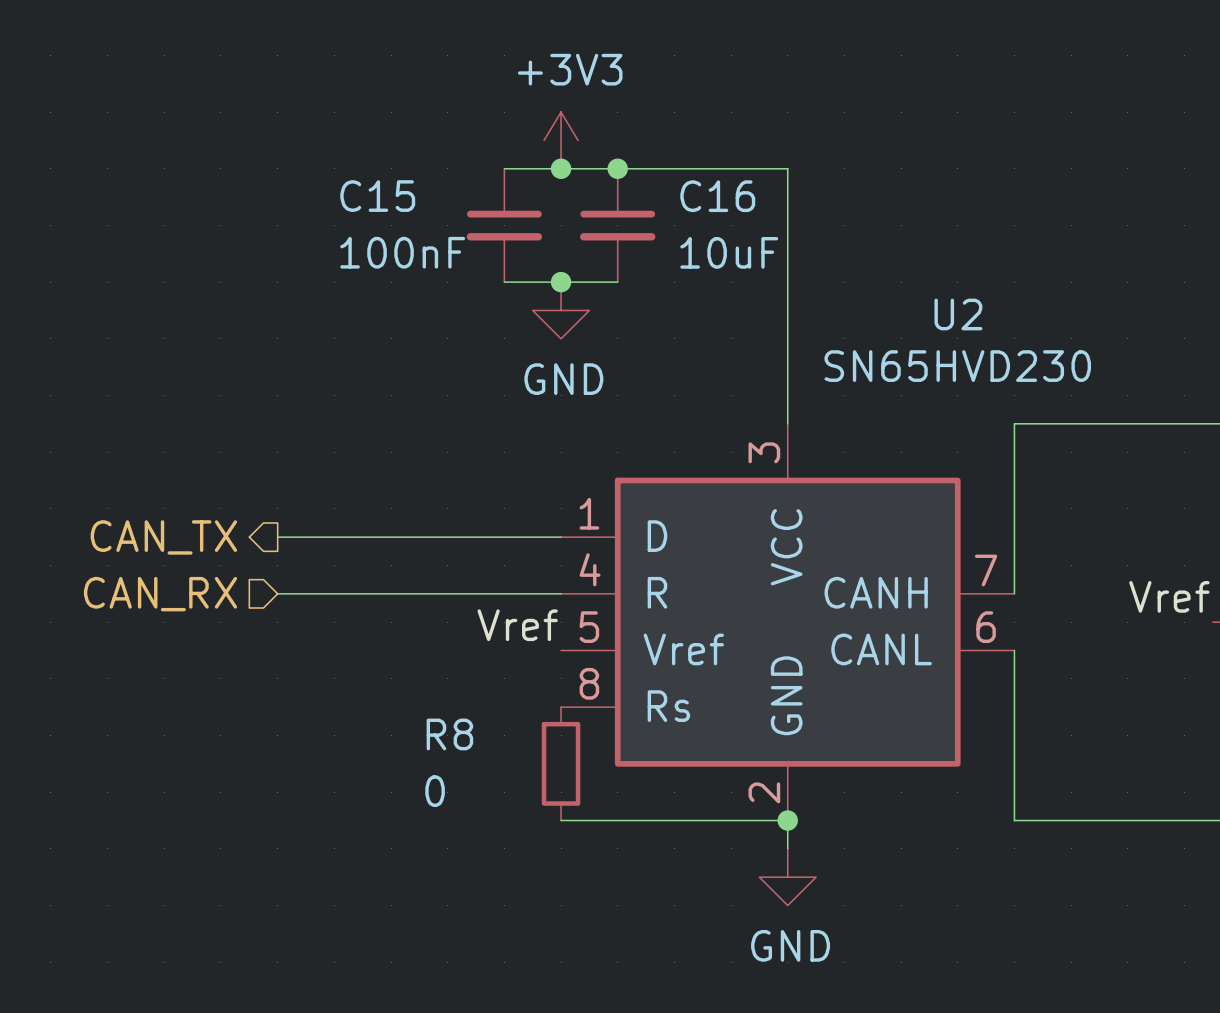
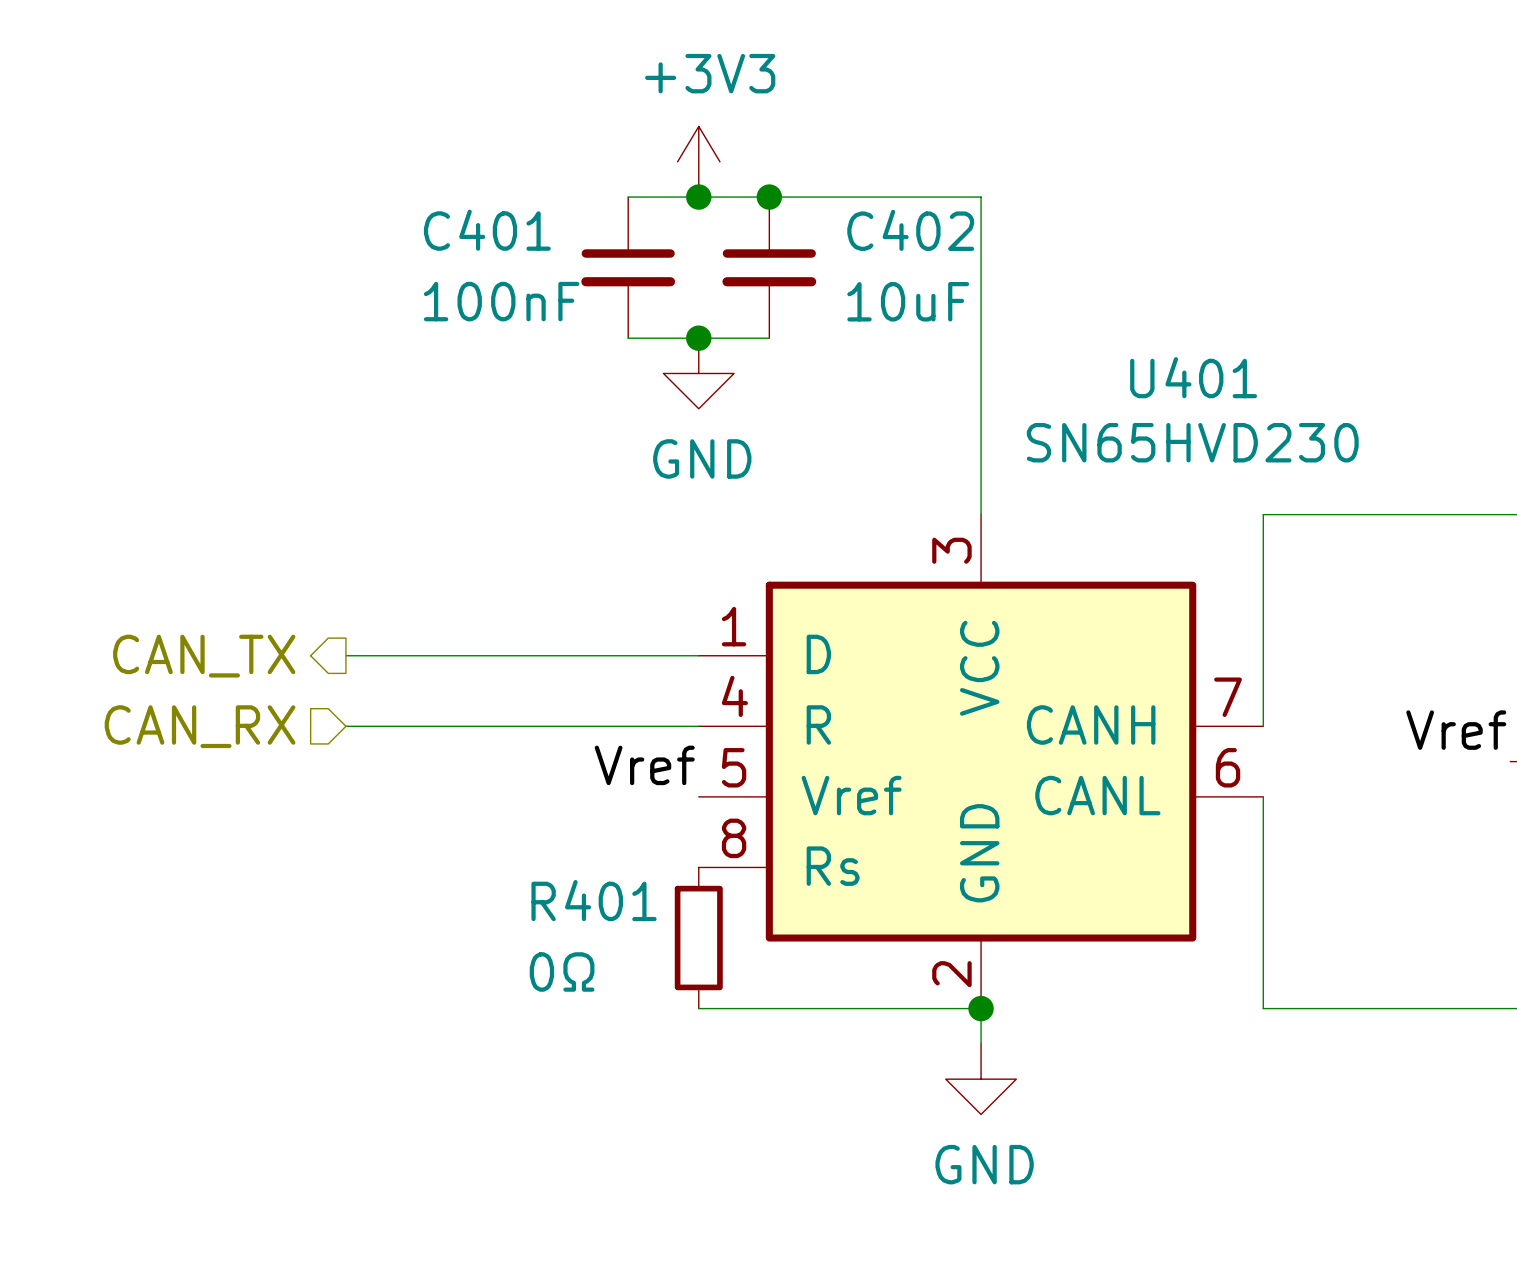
C15 name: C15 (377, 196) -> C401 (487, 230)
C16 name: C16 (717, 196) -> C402 (910, 230)
U2 name: U2 (958, 314) -> U401 (1193, 377)
R8 name: R8 (449, 734) -> R401 (594, 900)
R8 value: 0 (435, 791) -> 0Ω (562, 971)

